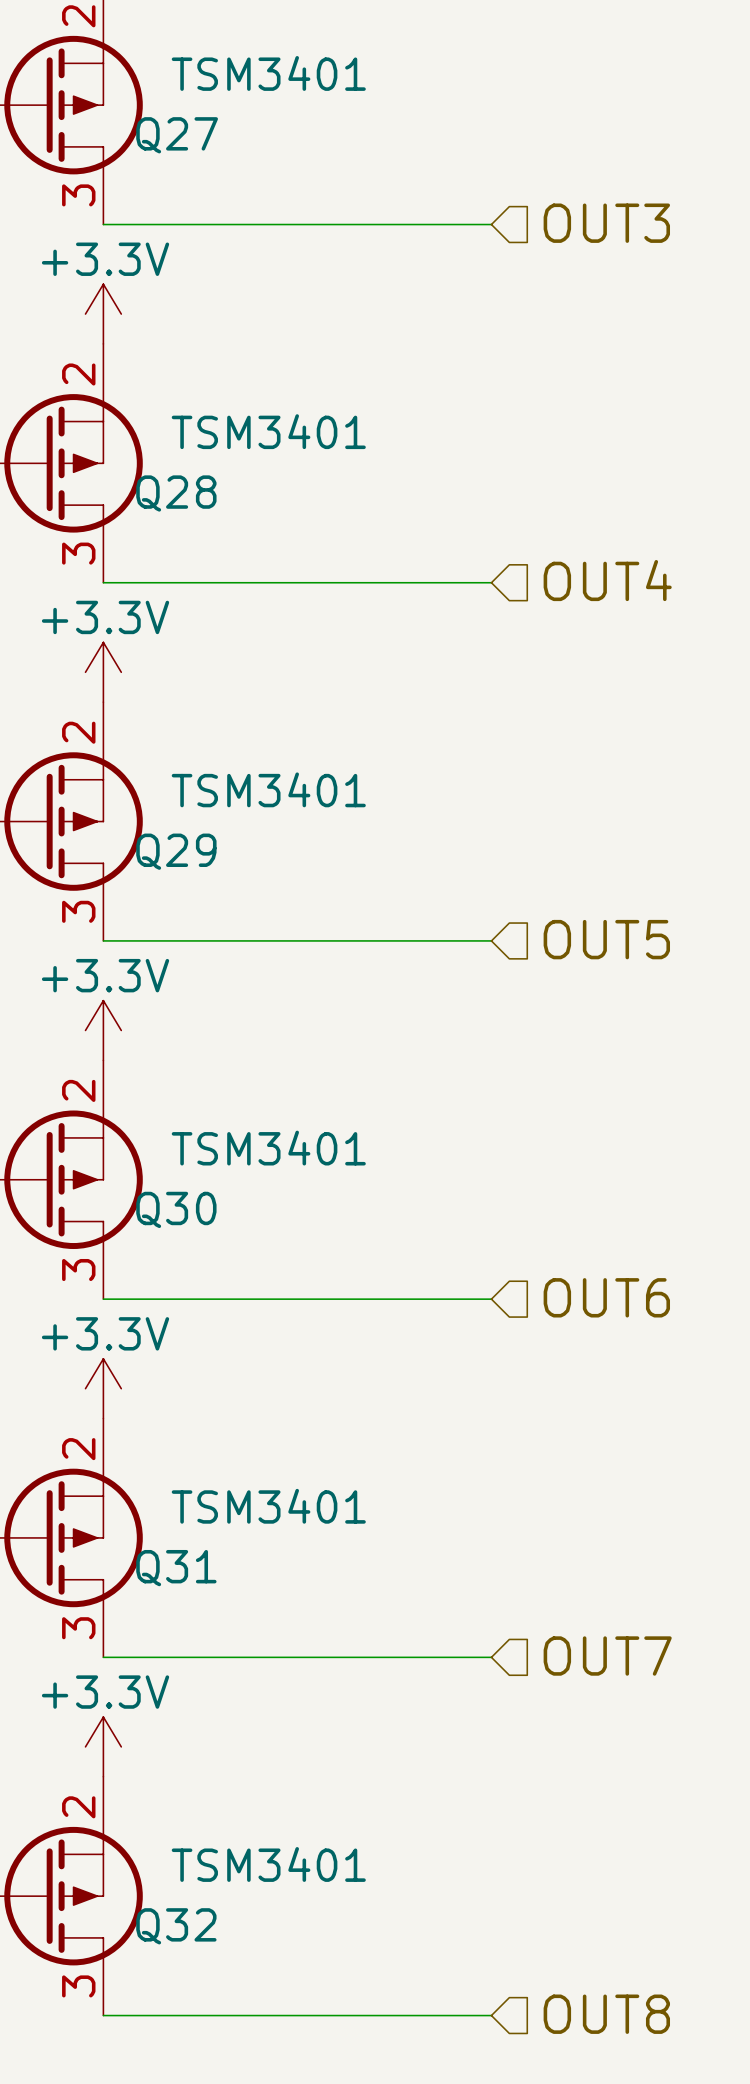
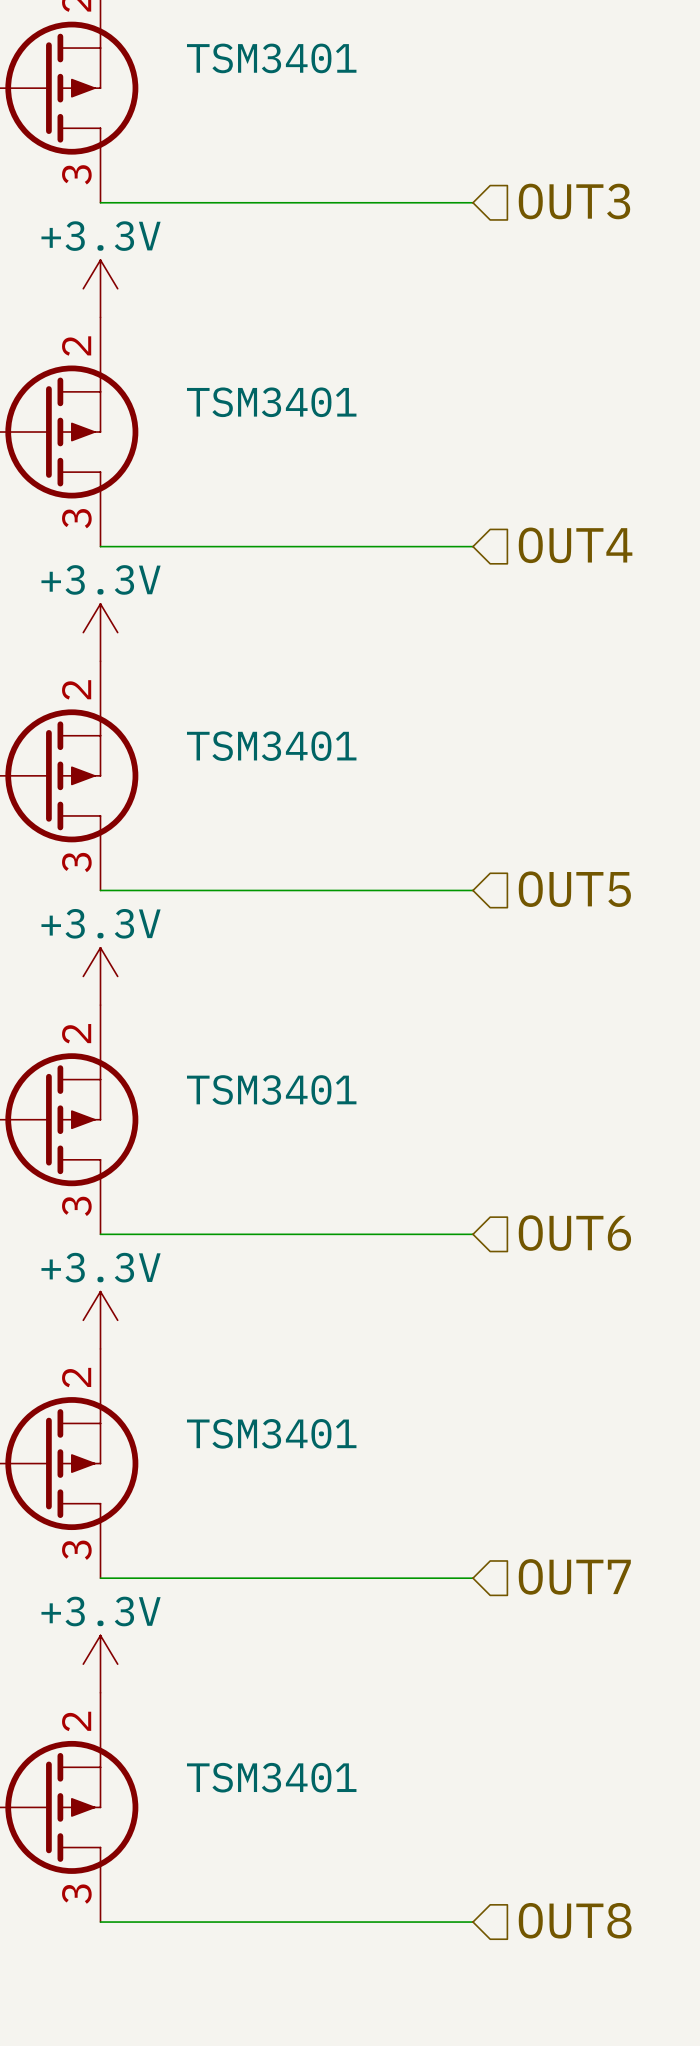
Q27 name: Q27 (177, 135) -> none
Q28 name: Q28 (176, 493) -> none
Q29 name: Q29 (176, 851) -> none
Q30 name: Q30 (176, 1209) -> none
Q31 name: Q31 (176, 1568) -> none
Q32 name: Q32 (176, 1926) -> none

